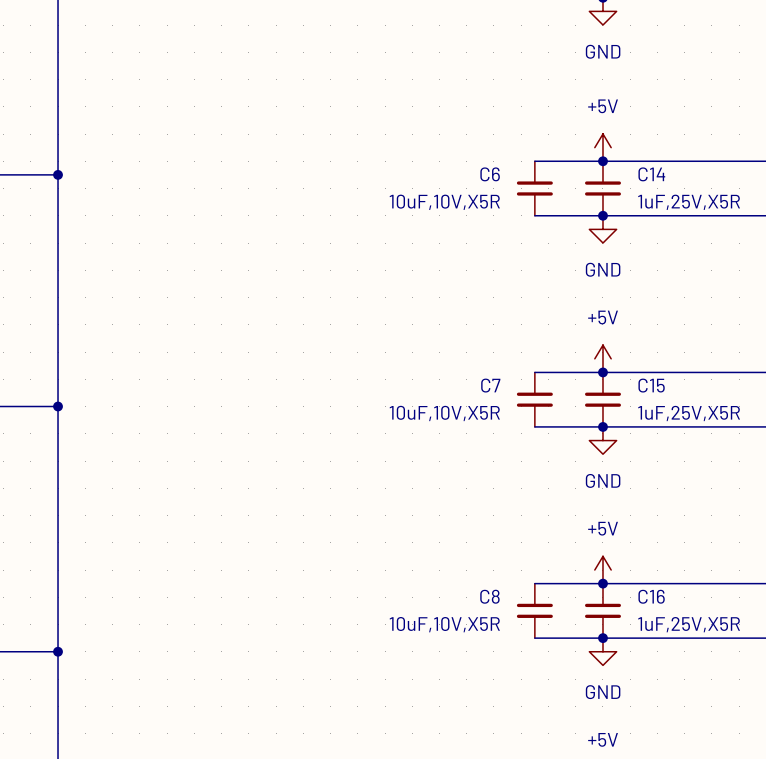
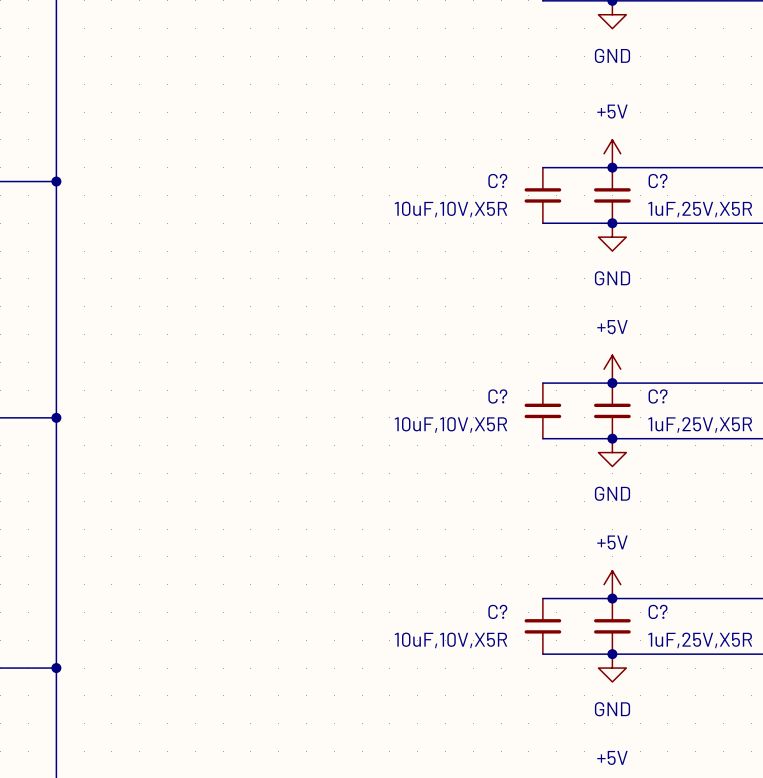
C6 name: C6 (490, 174) -> C? (497, 181)
C14 name: C14 (651, 174) -> C? (658, 181)
C7 name: C7 (490, 385) -> C? (497, 396)
C15 name: C15 (651, 385) -> C? (658, 396)
C8 name: C8 (489, 596) -> C? (497, 611)
C16 name: C16 (651, 596) -> C? (658, 611)

